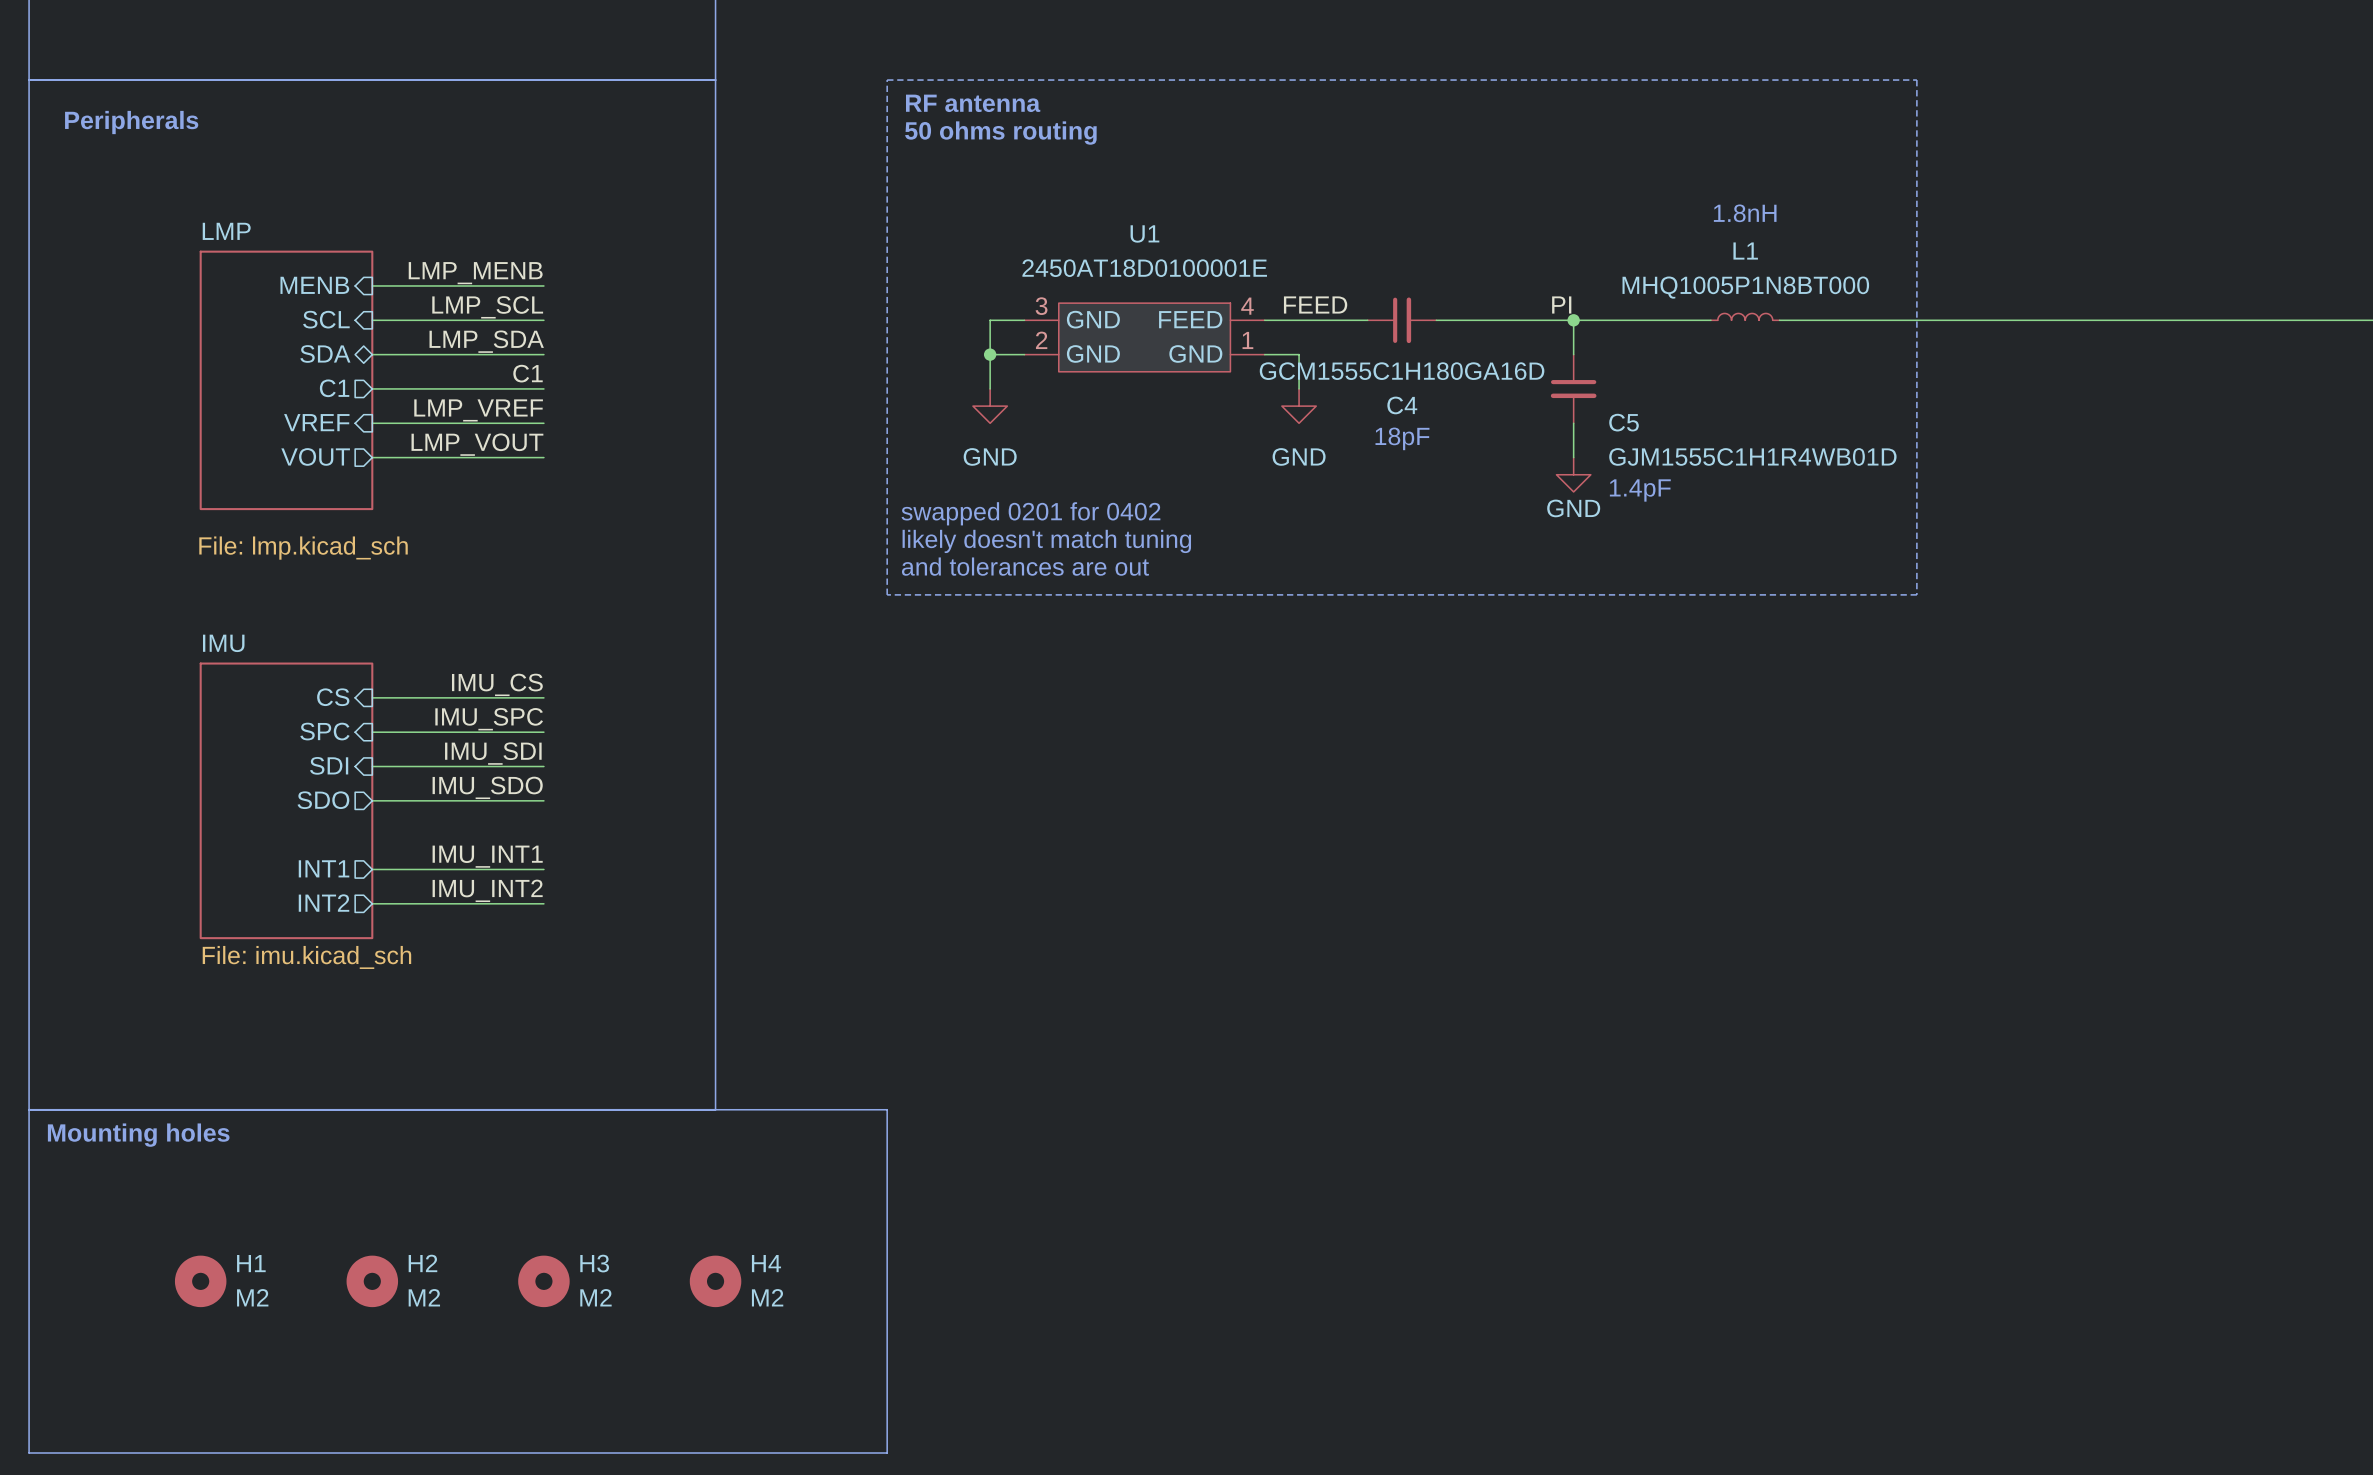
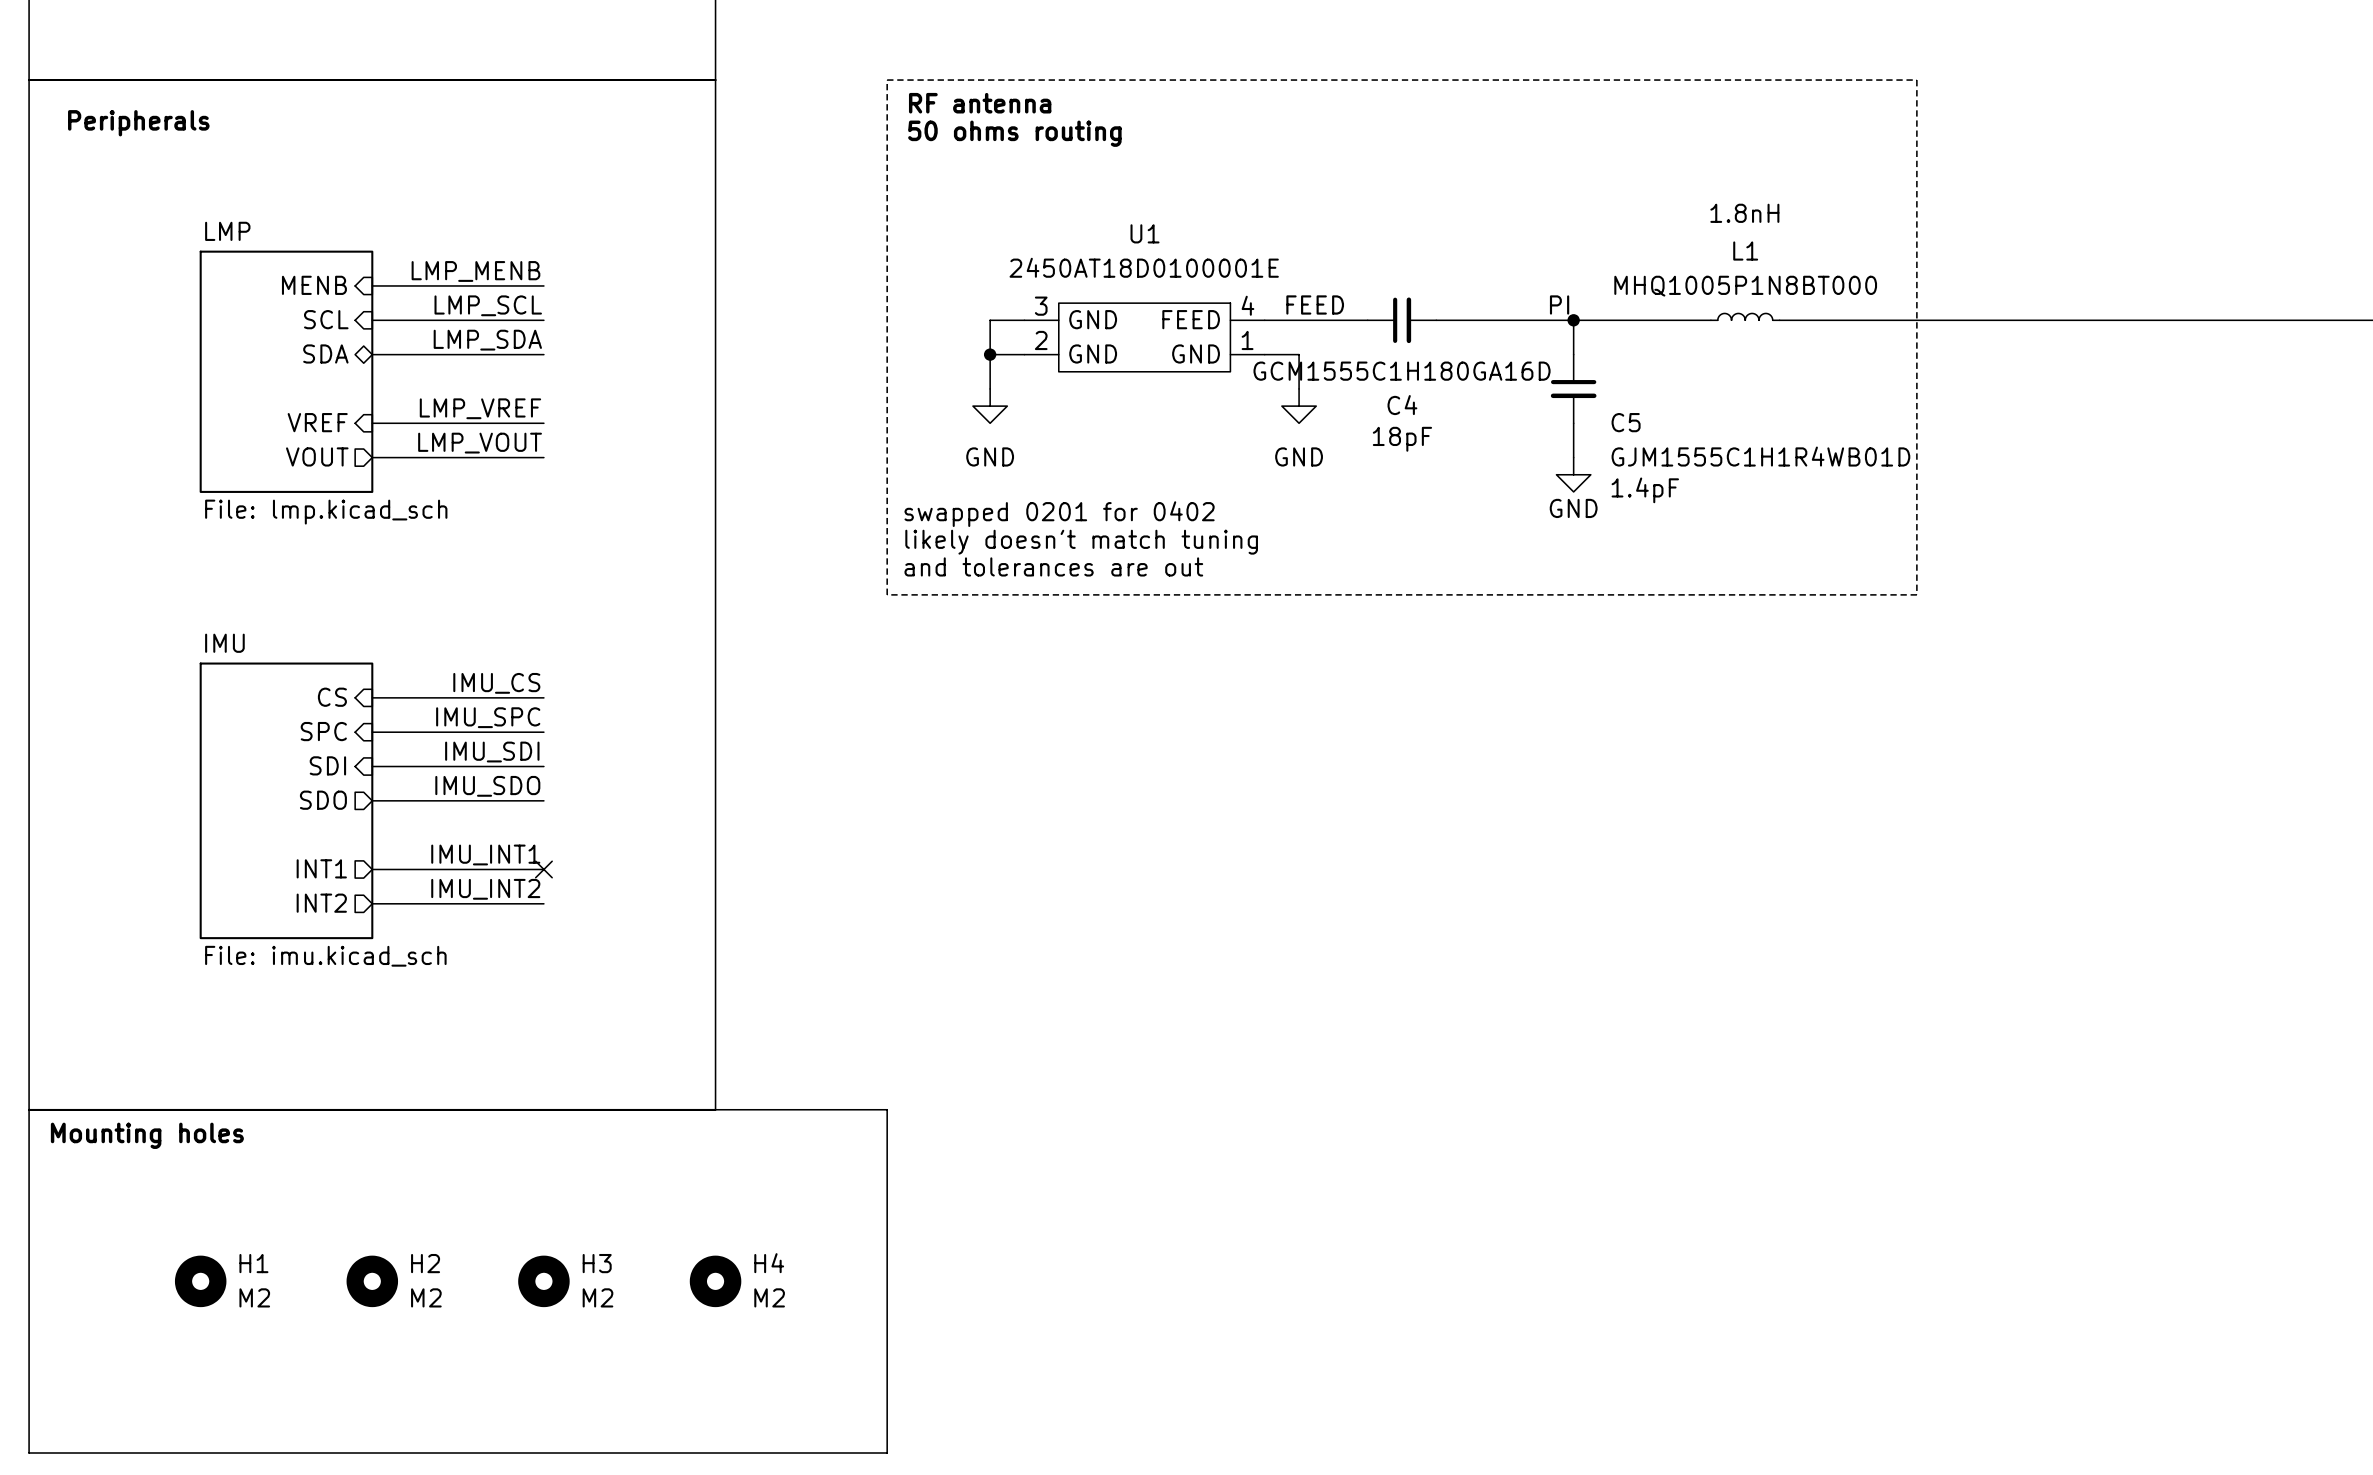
sheet LMP shape: [199, 250, 374, 511] -> [199, 250, 374, 493]
label: C1 (528, 373) -> none
sheet pin: C1 (334, 388) -> none
wire: (372, 388) (543, 388) -> none
sheet LMP value position: File: lmp.kicad_sch (303, 548) -> File: lmp.kicad_sch (326, 512)
no-connect mark: none -> (543, 869)

